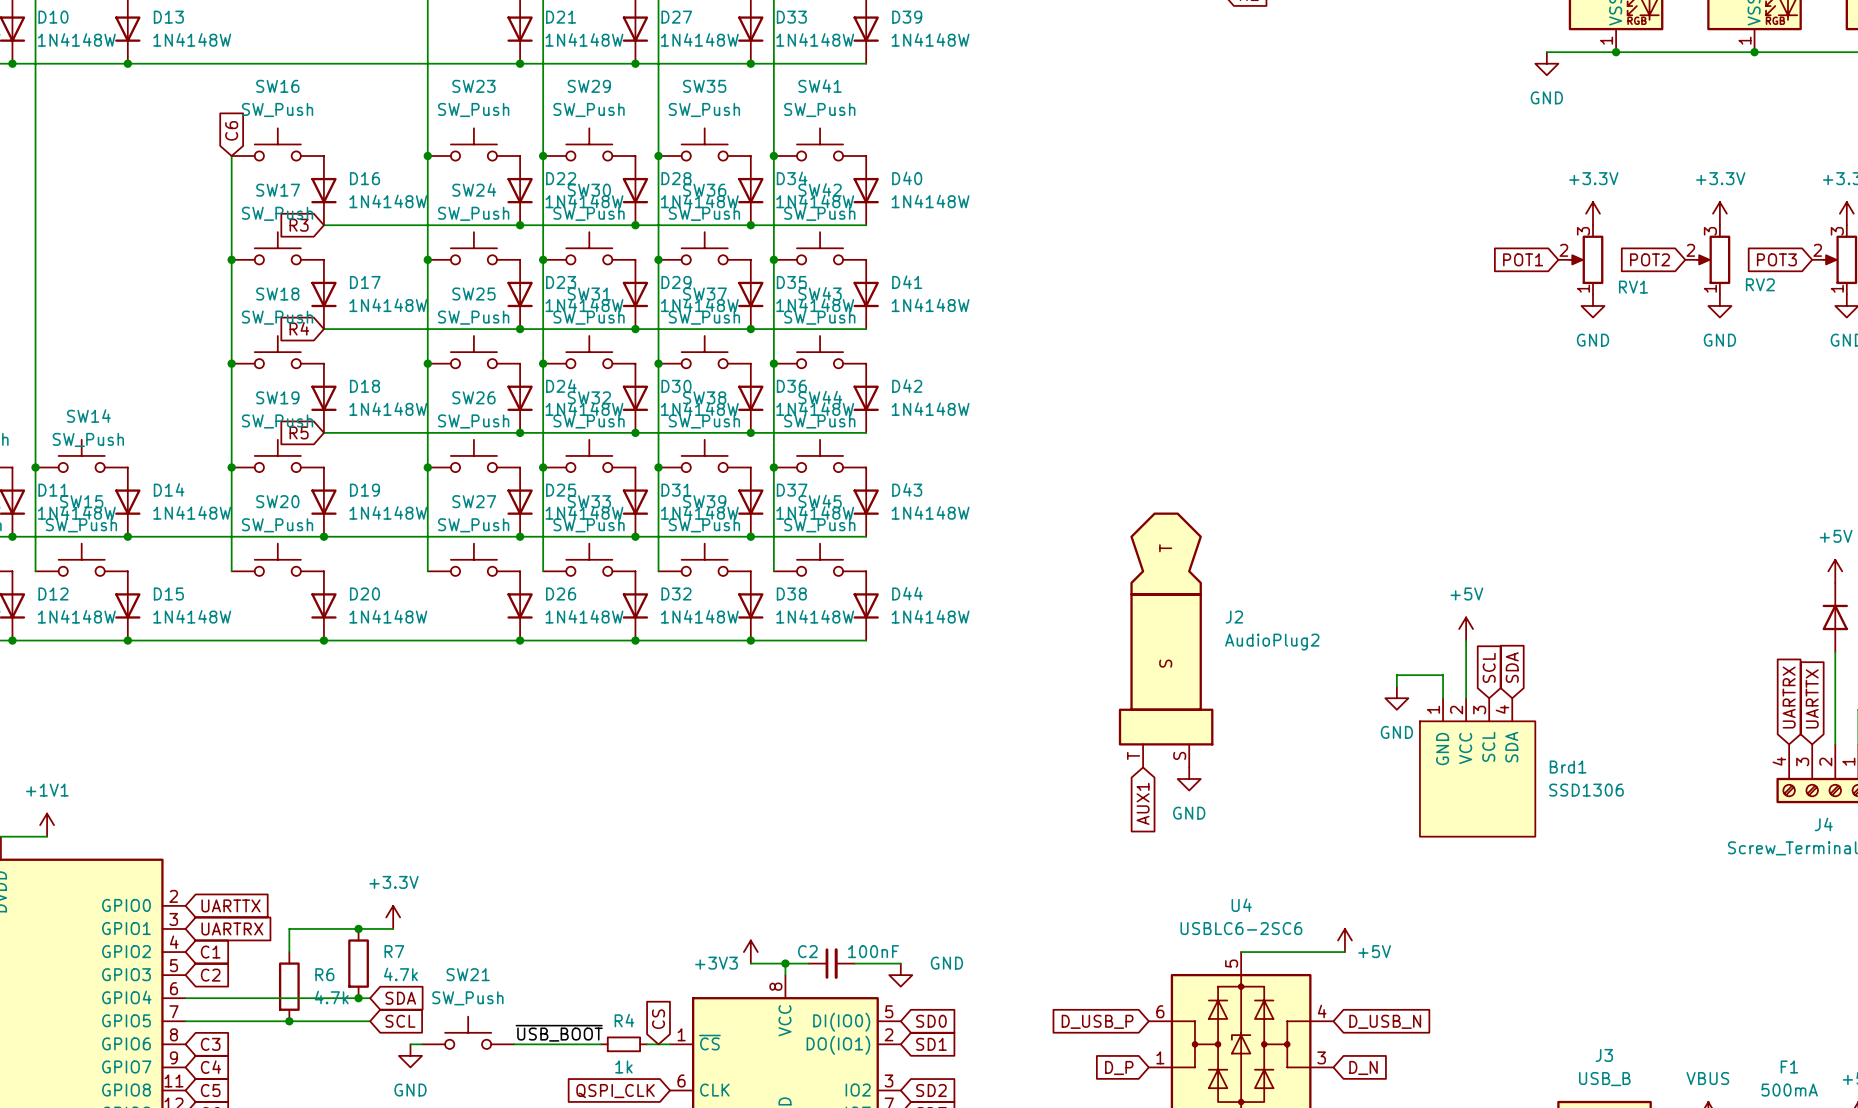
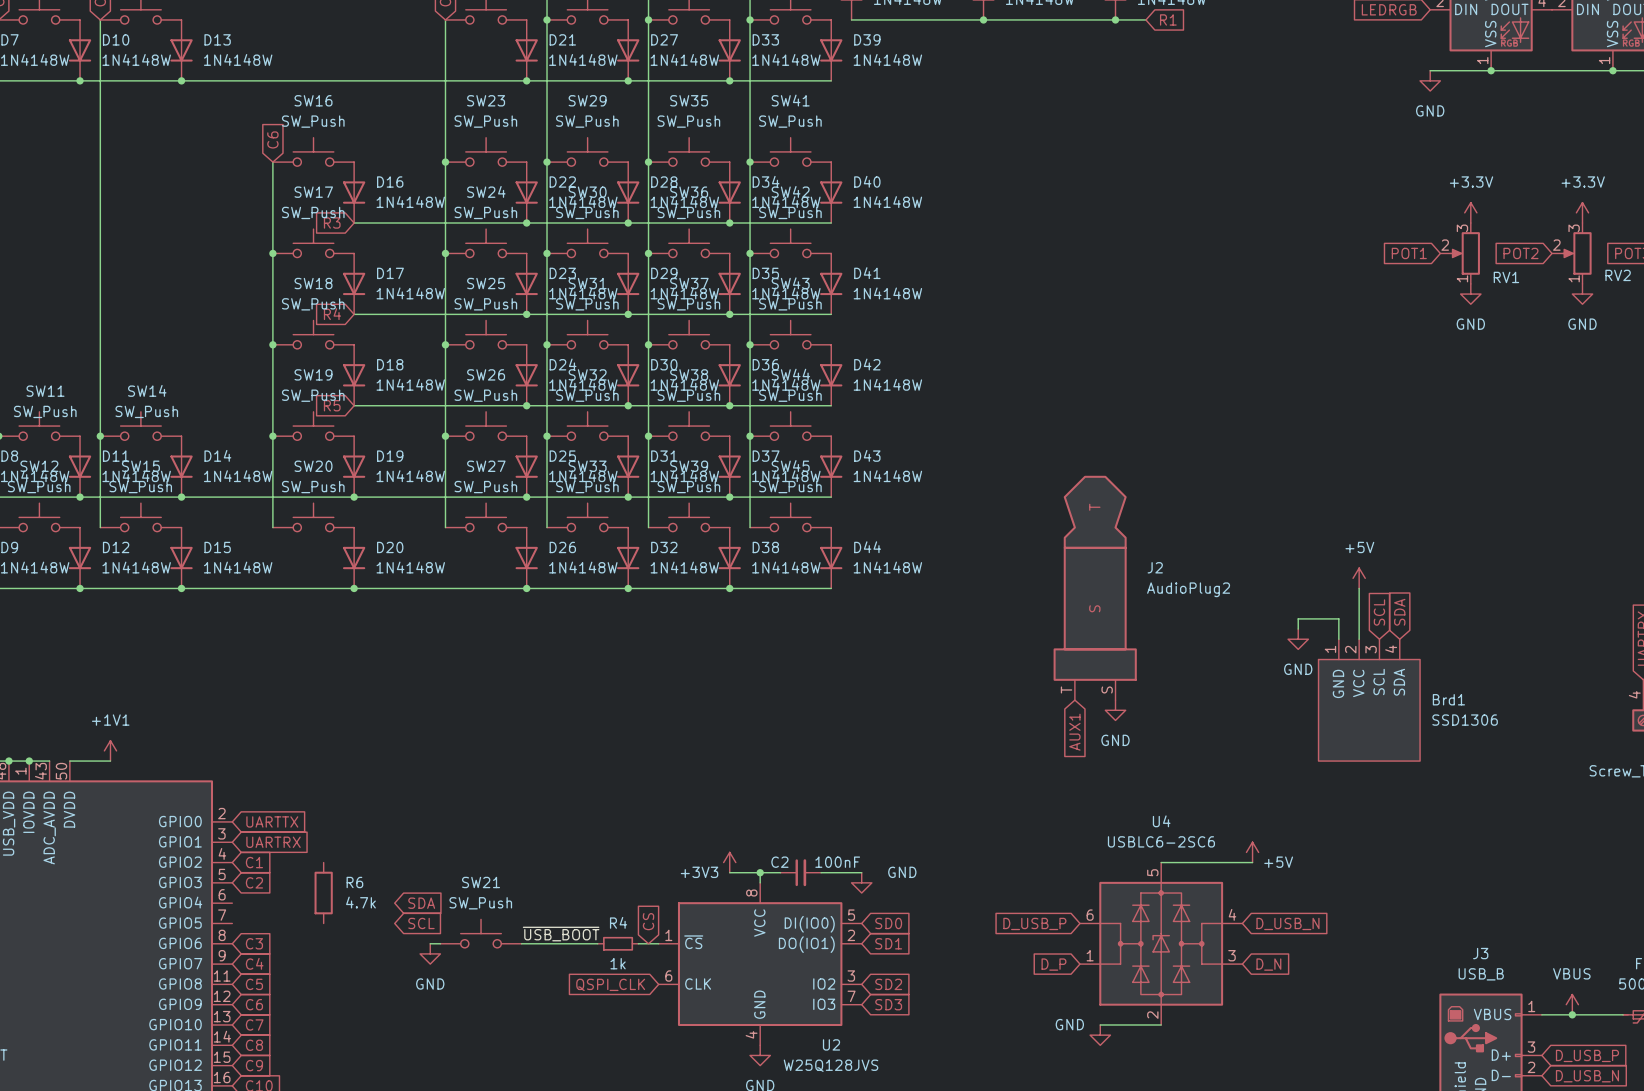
power symbol: +3.3V (393, 917) -> none
junction: (358, 928) -> none
wire: (393, 928) (289, 928) (289, 952) -> none
R7: 4.7k (358, 963) -> none
wire: (185, 998) (370, 998) -> none
junction: (358, 998) -> none
wire: (185, 1021) (370, 1021) -> none
junction: (289, 1021) -> none

